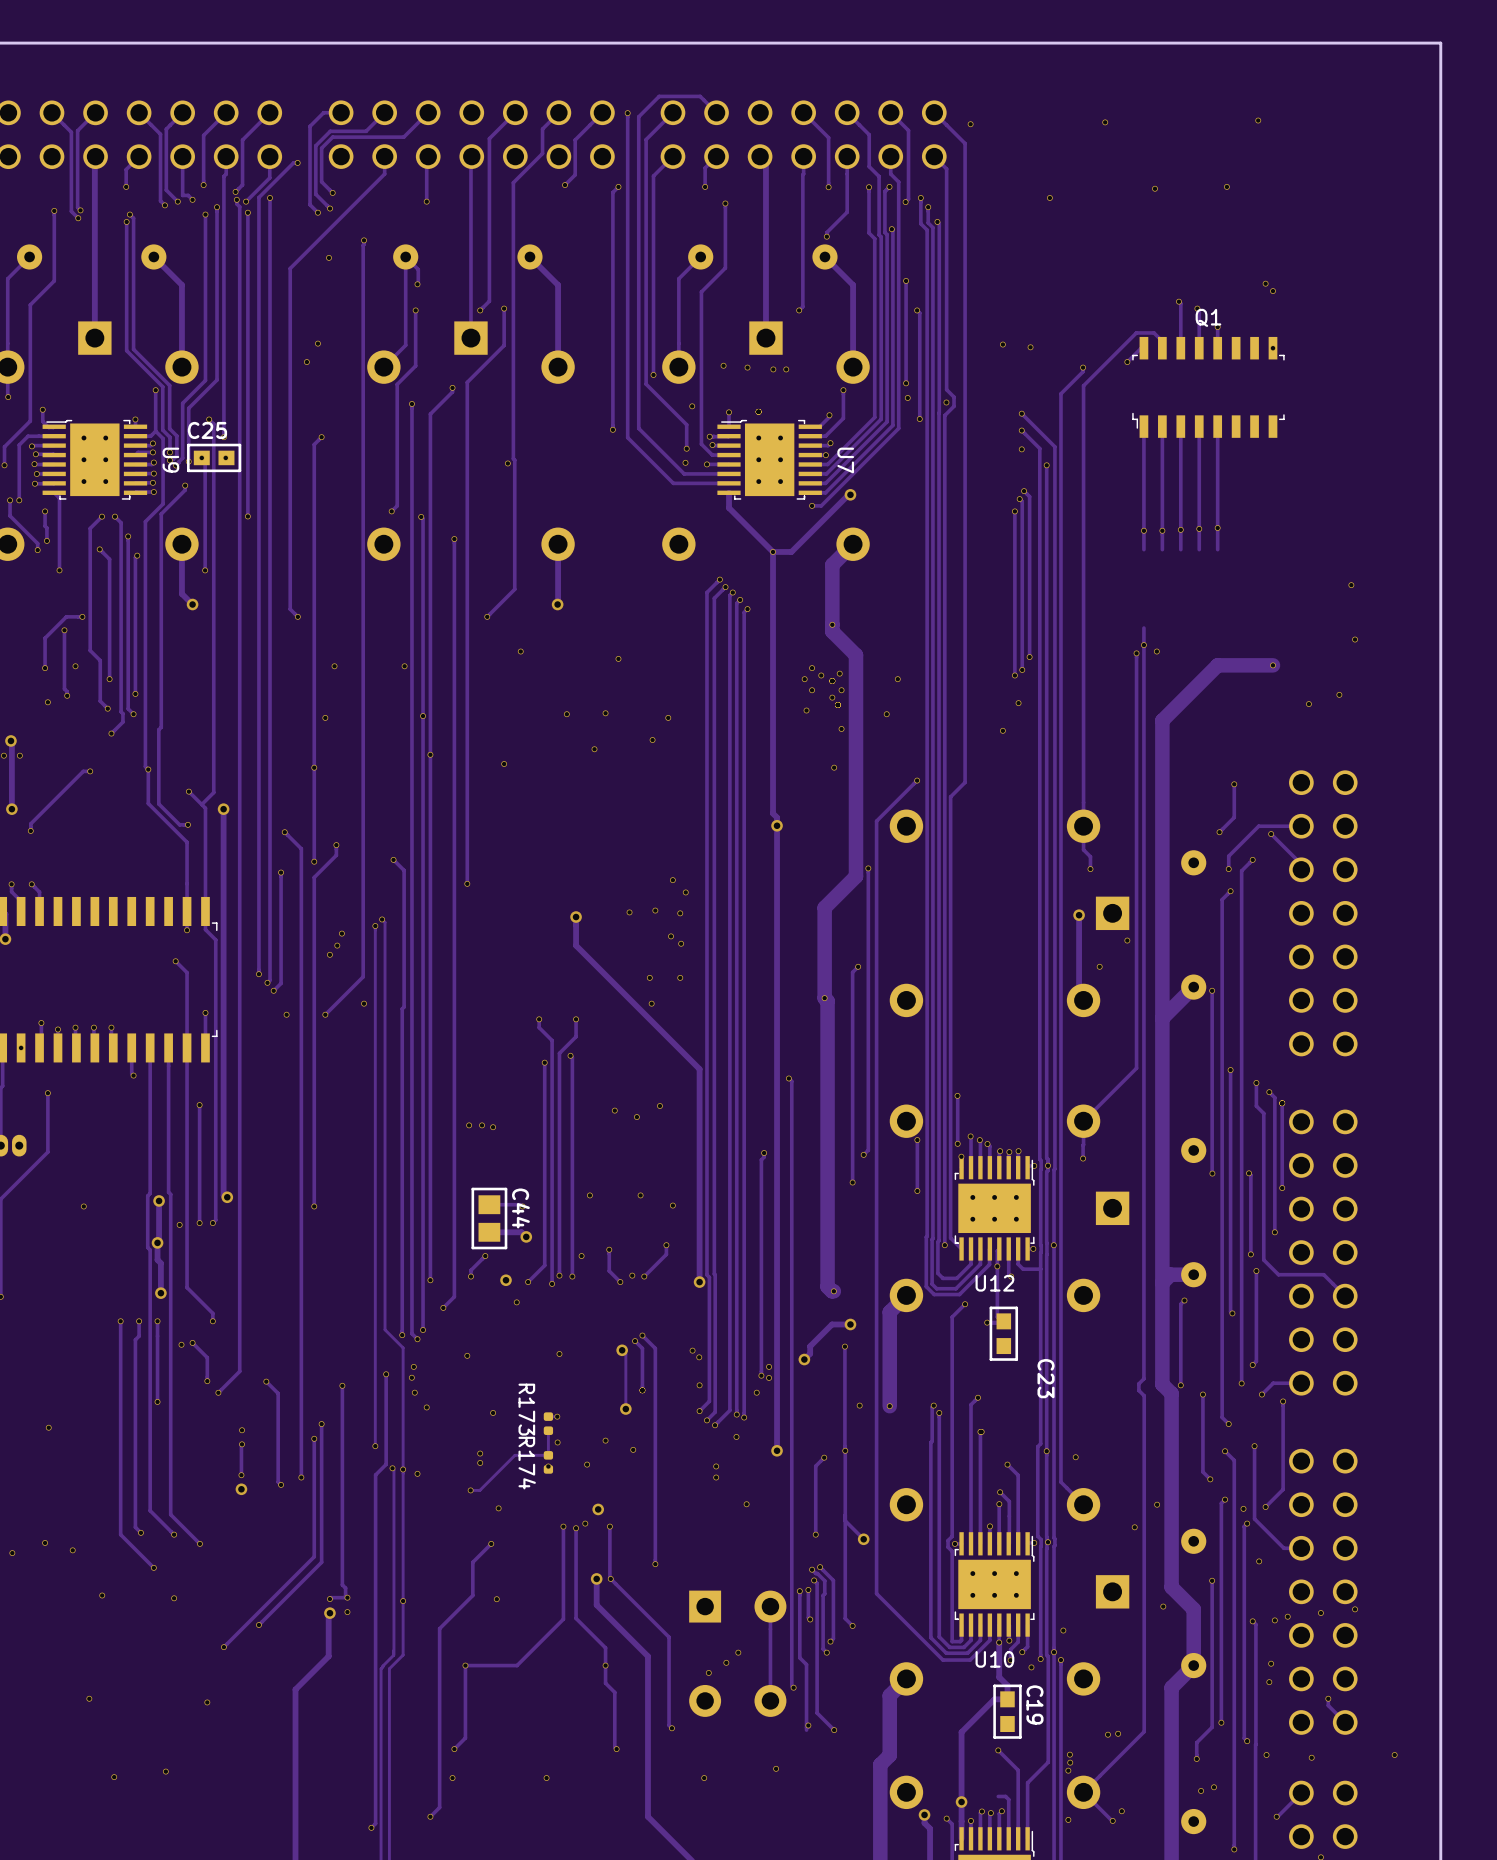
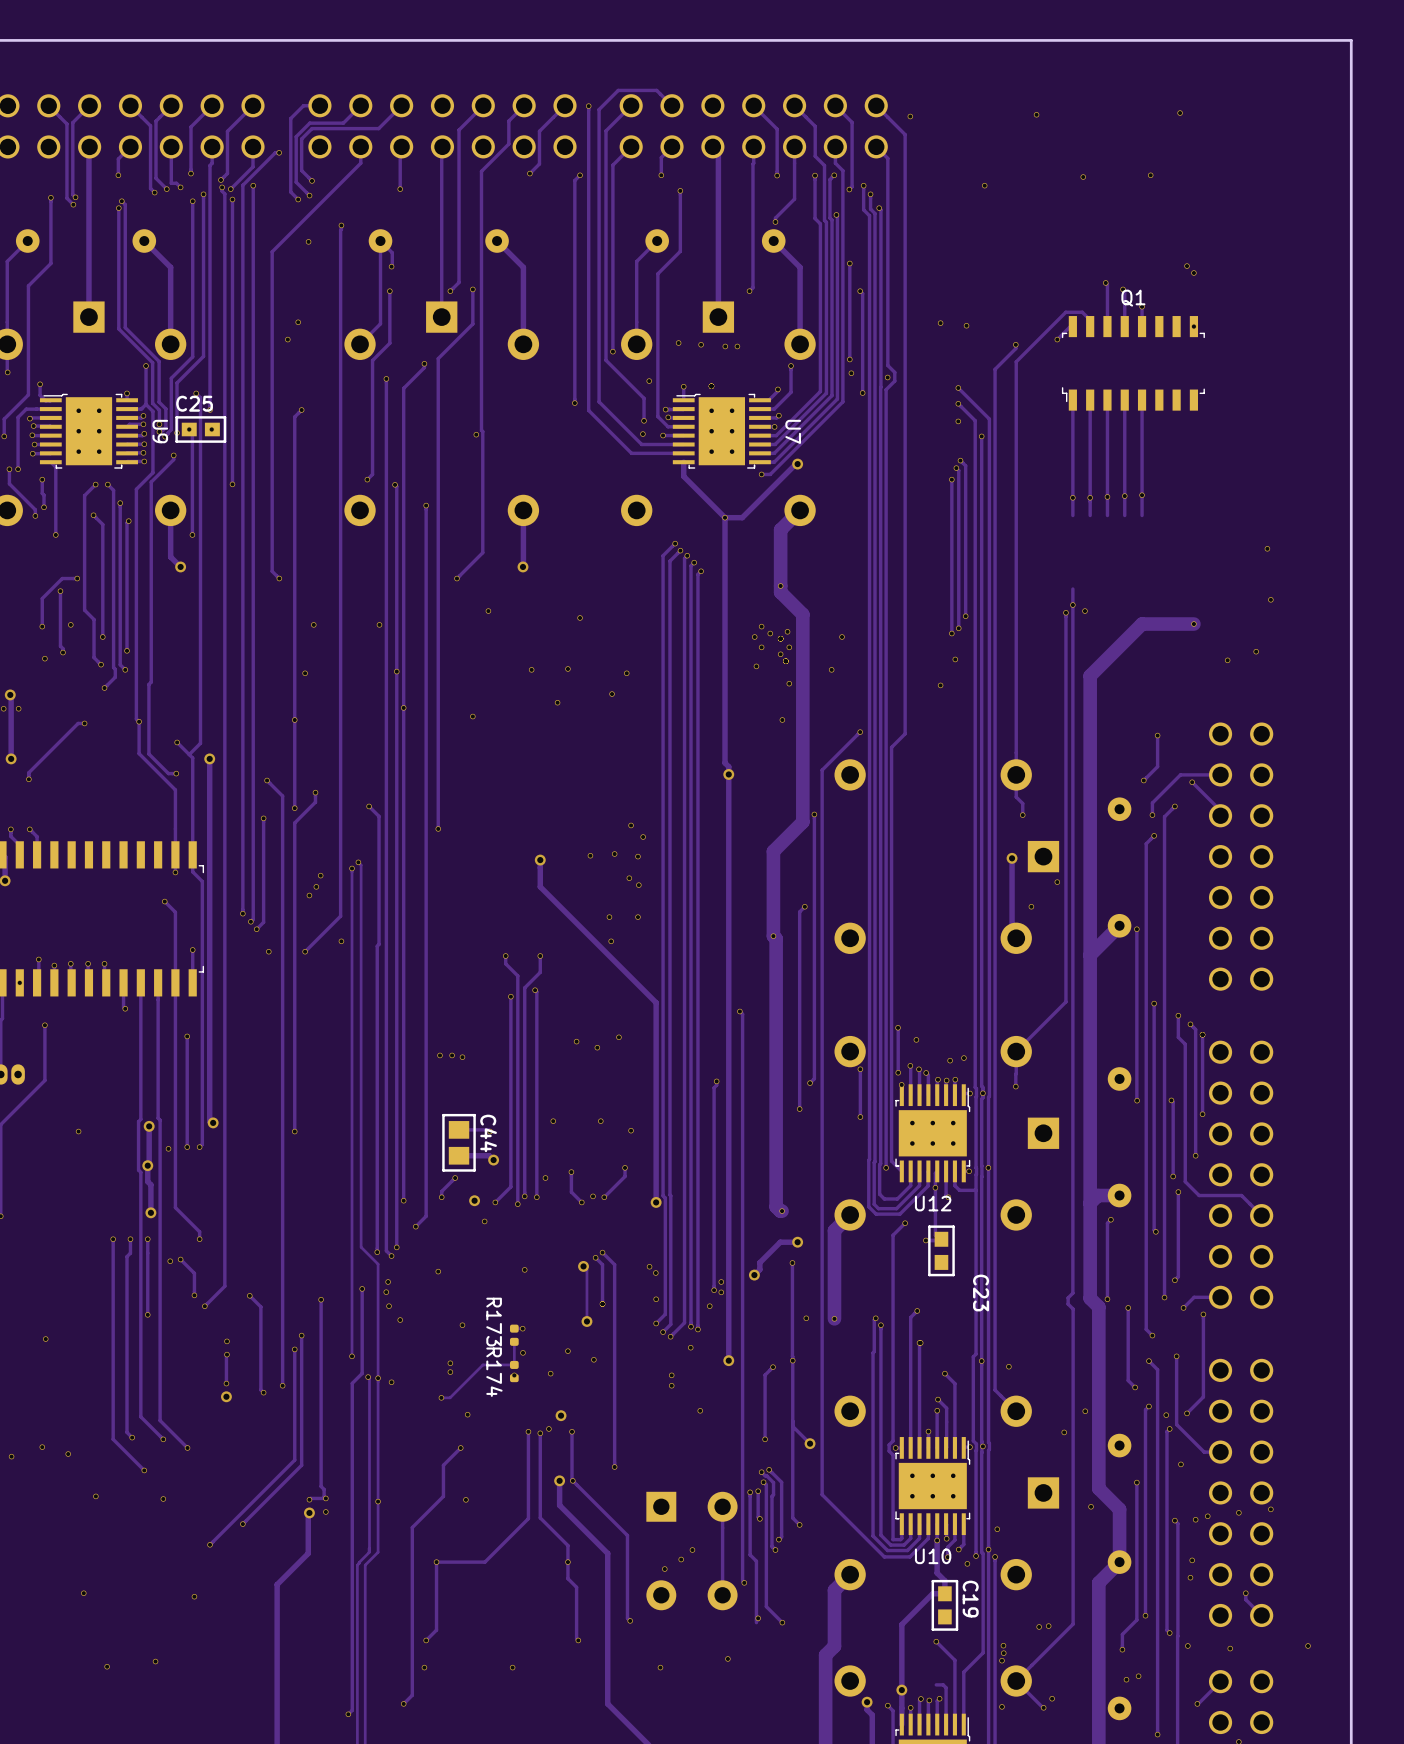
via: none -> (916, 1039)
via: none -> (963, 1058)
via: none -> (950, 1060)

